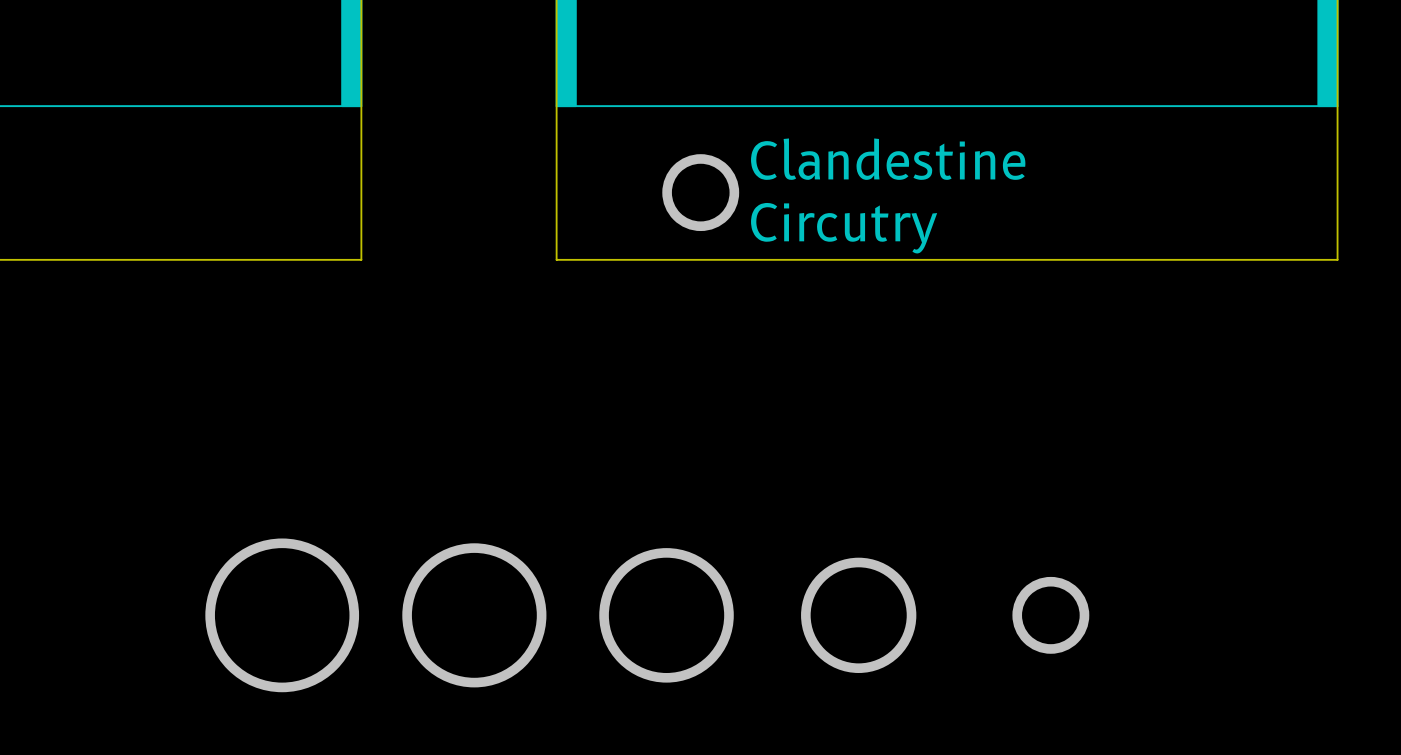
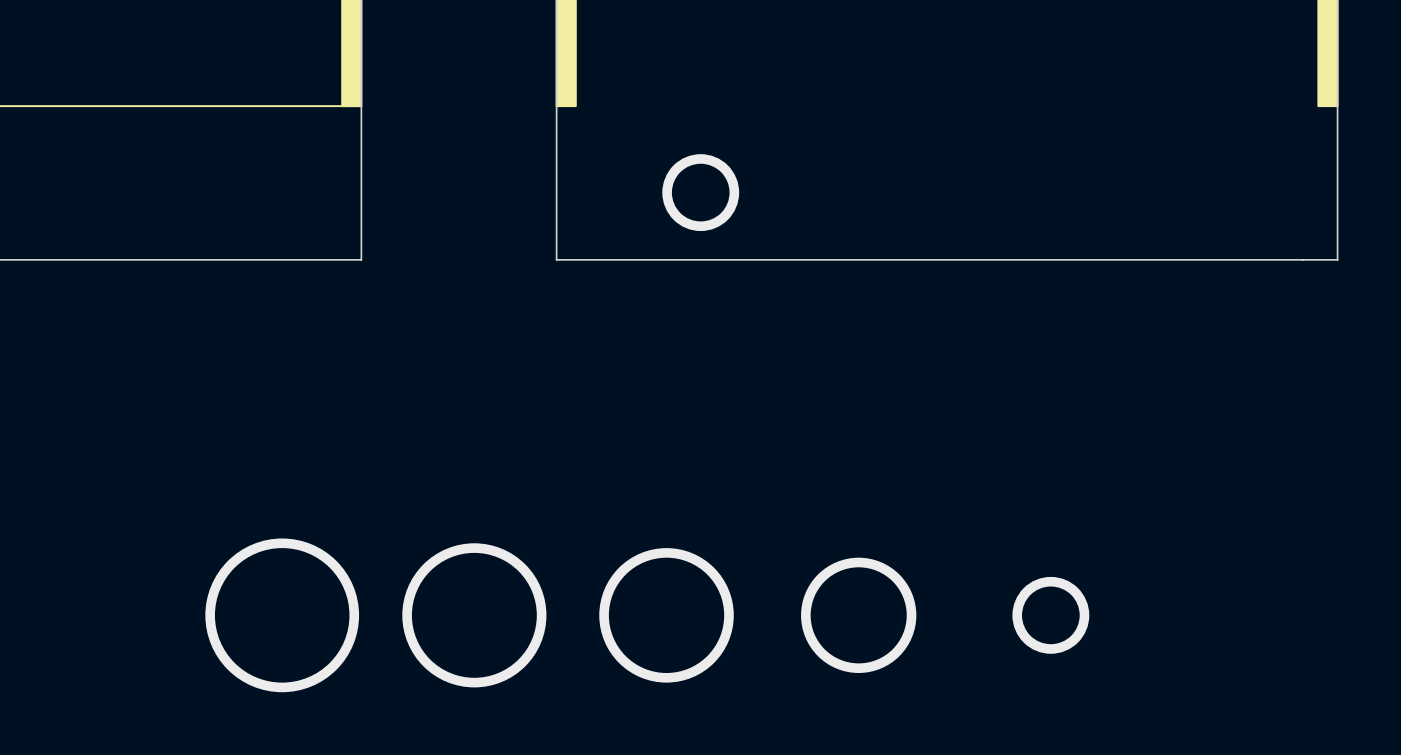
line: (556, 106) (1337, 106) -> none
text: Clandestine (888, 159) -> none
text: Circutry (844, 228) -> none

